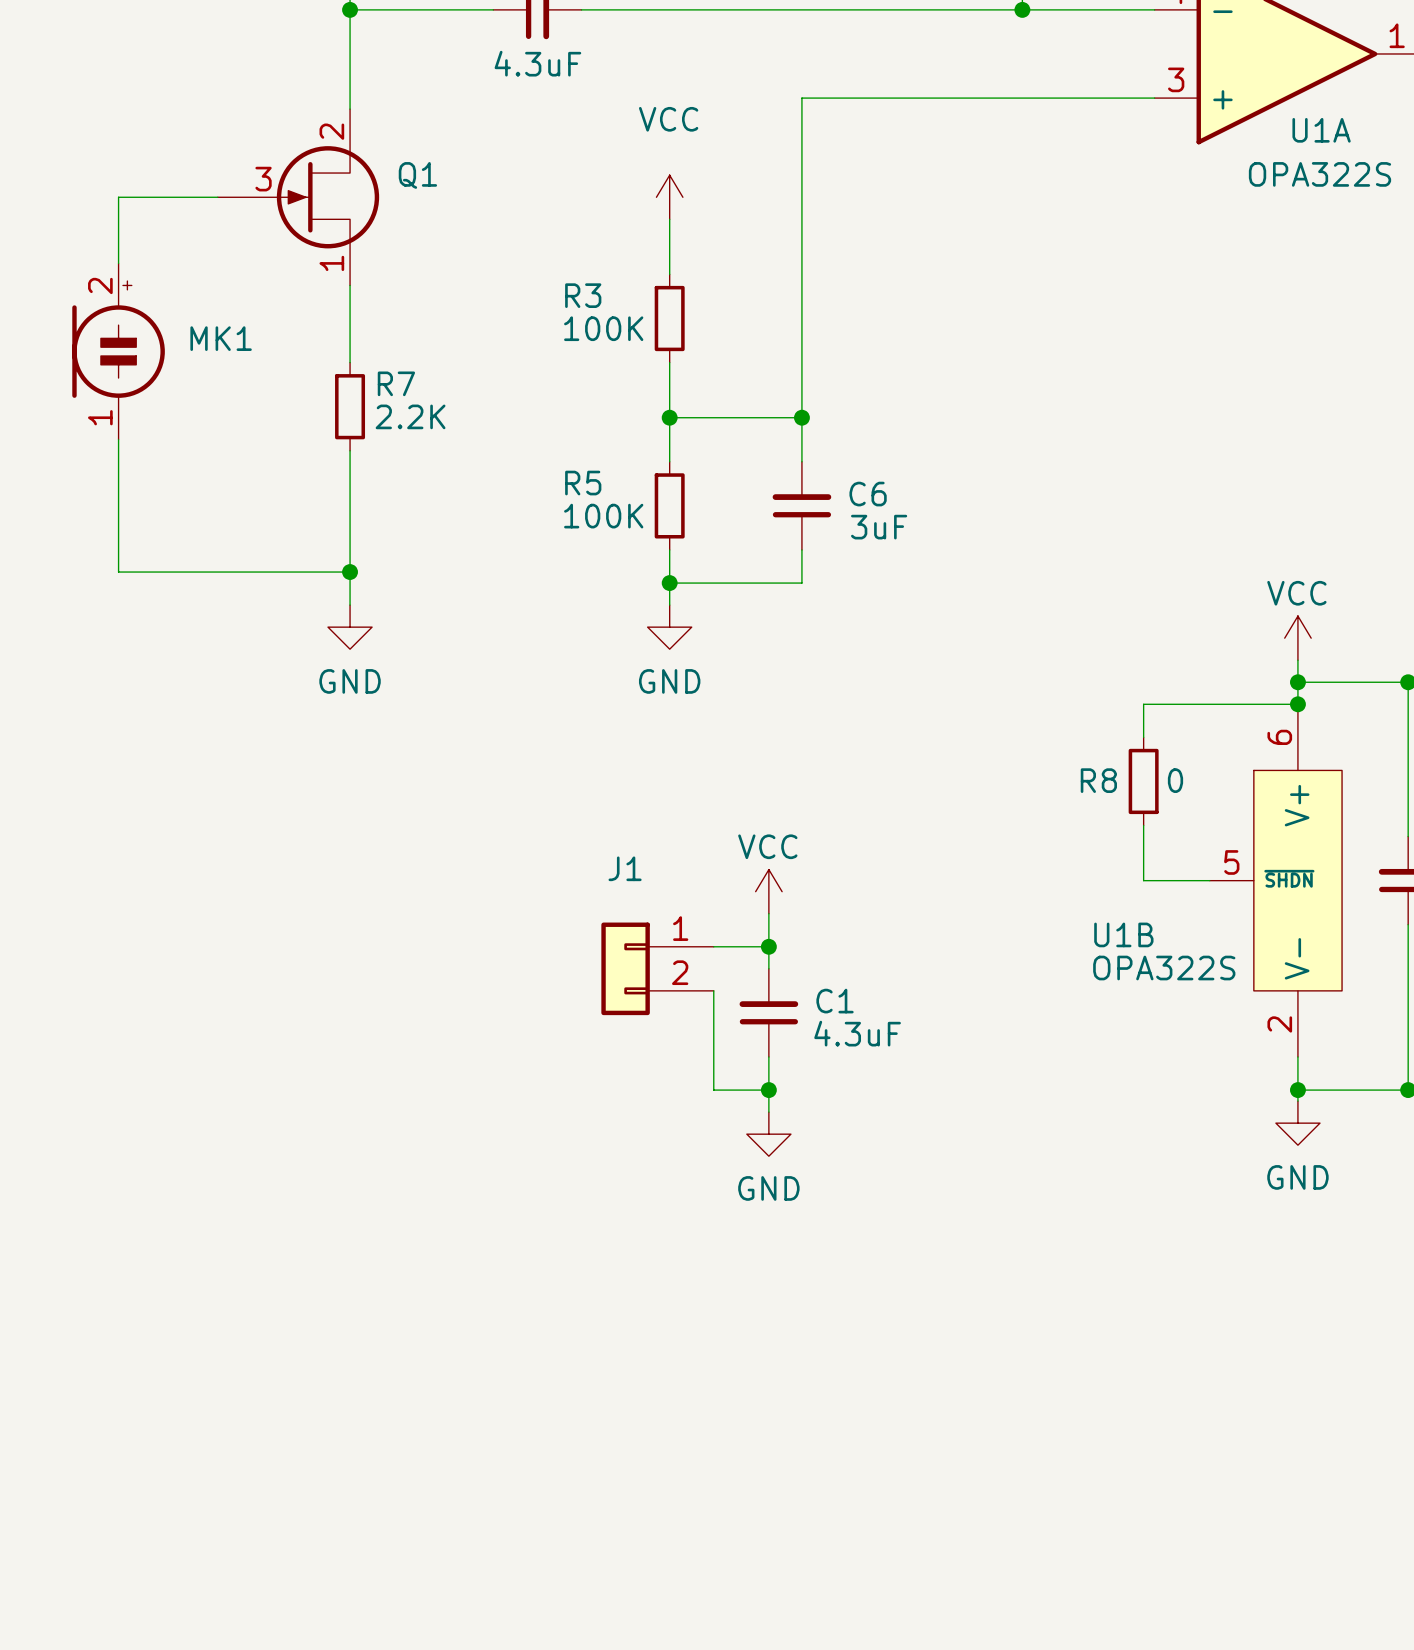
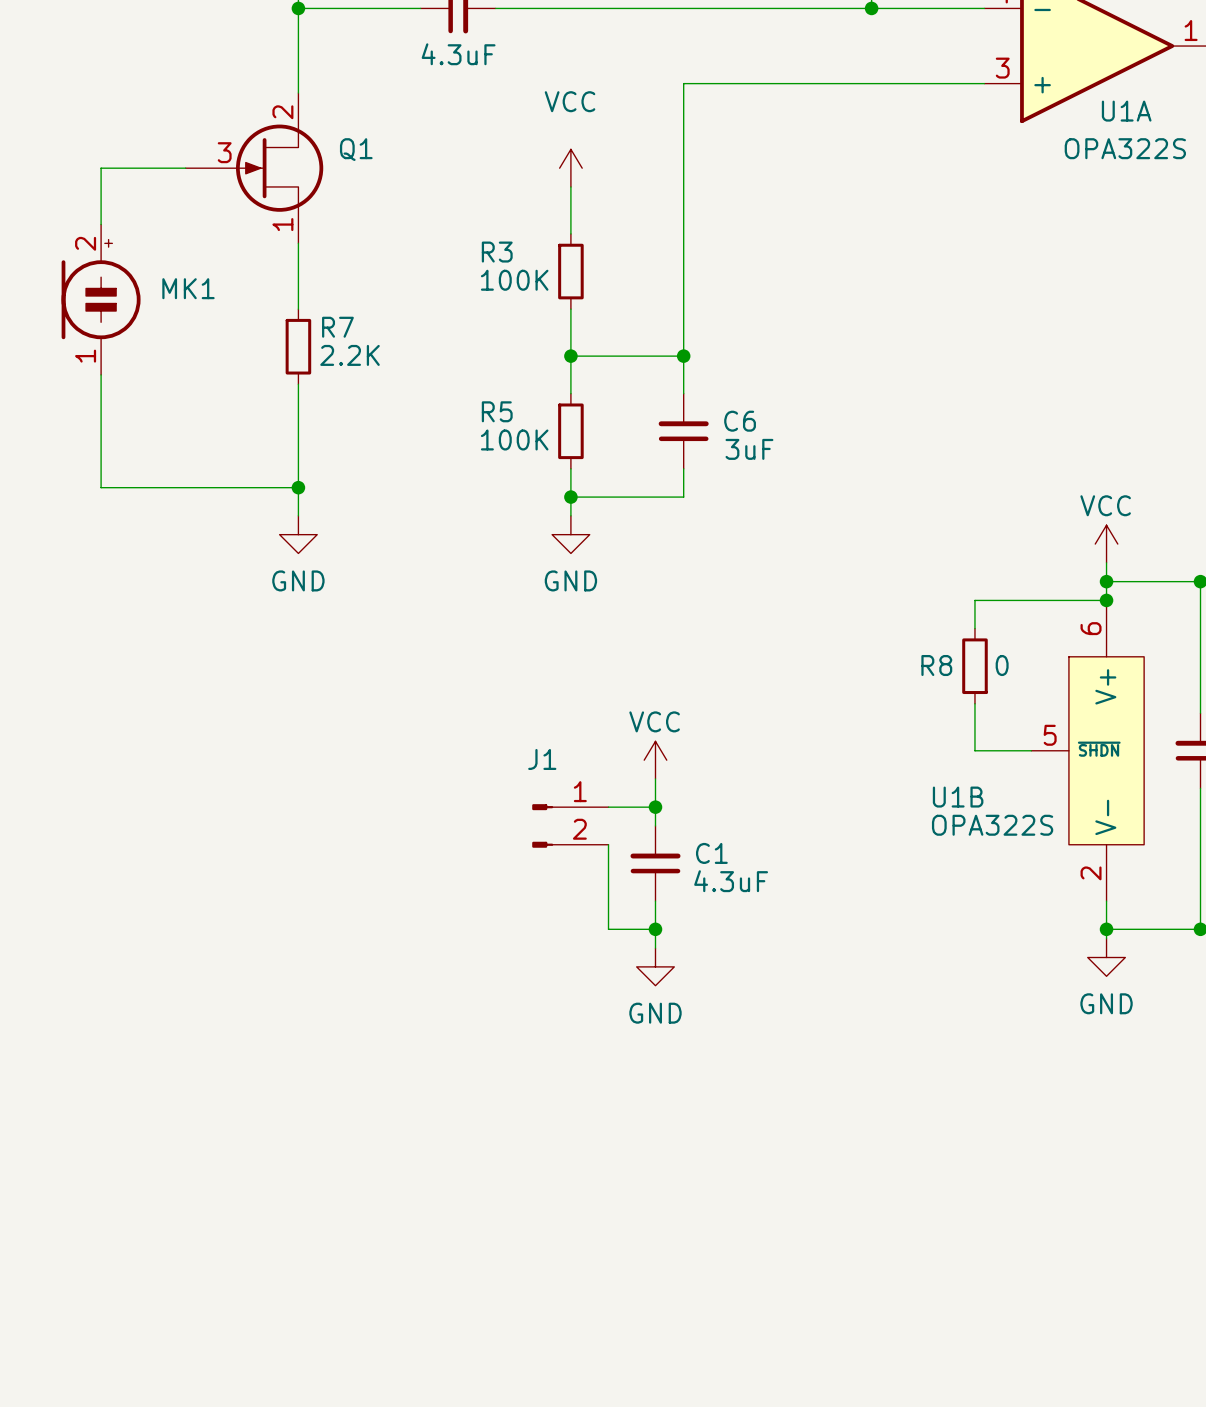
J1 symbol: [601, 922, 714, 1016] -> [532, 804, 609, 848]

